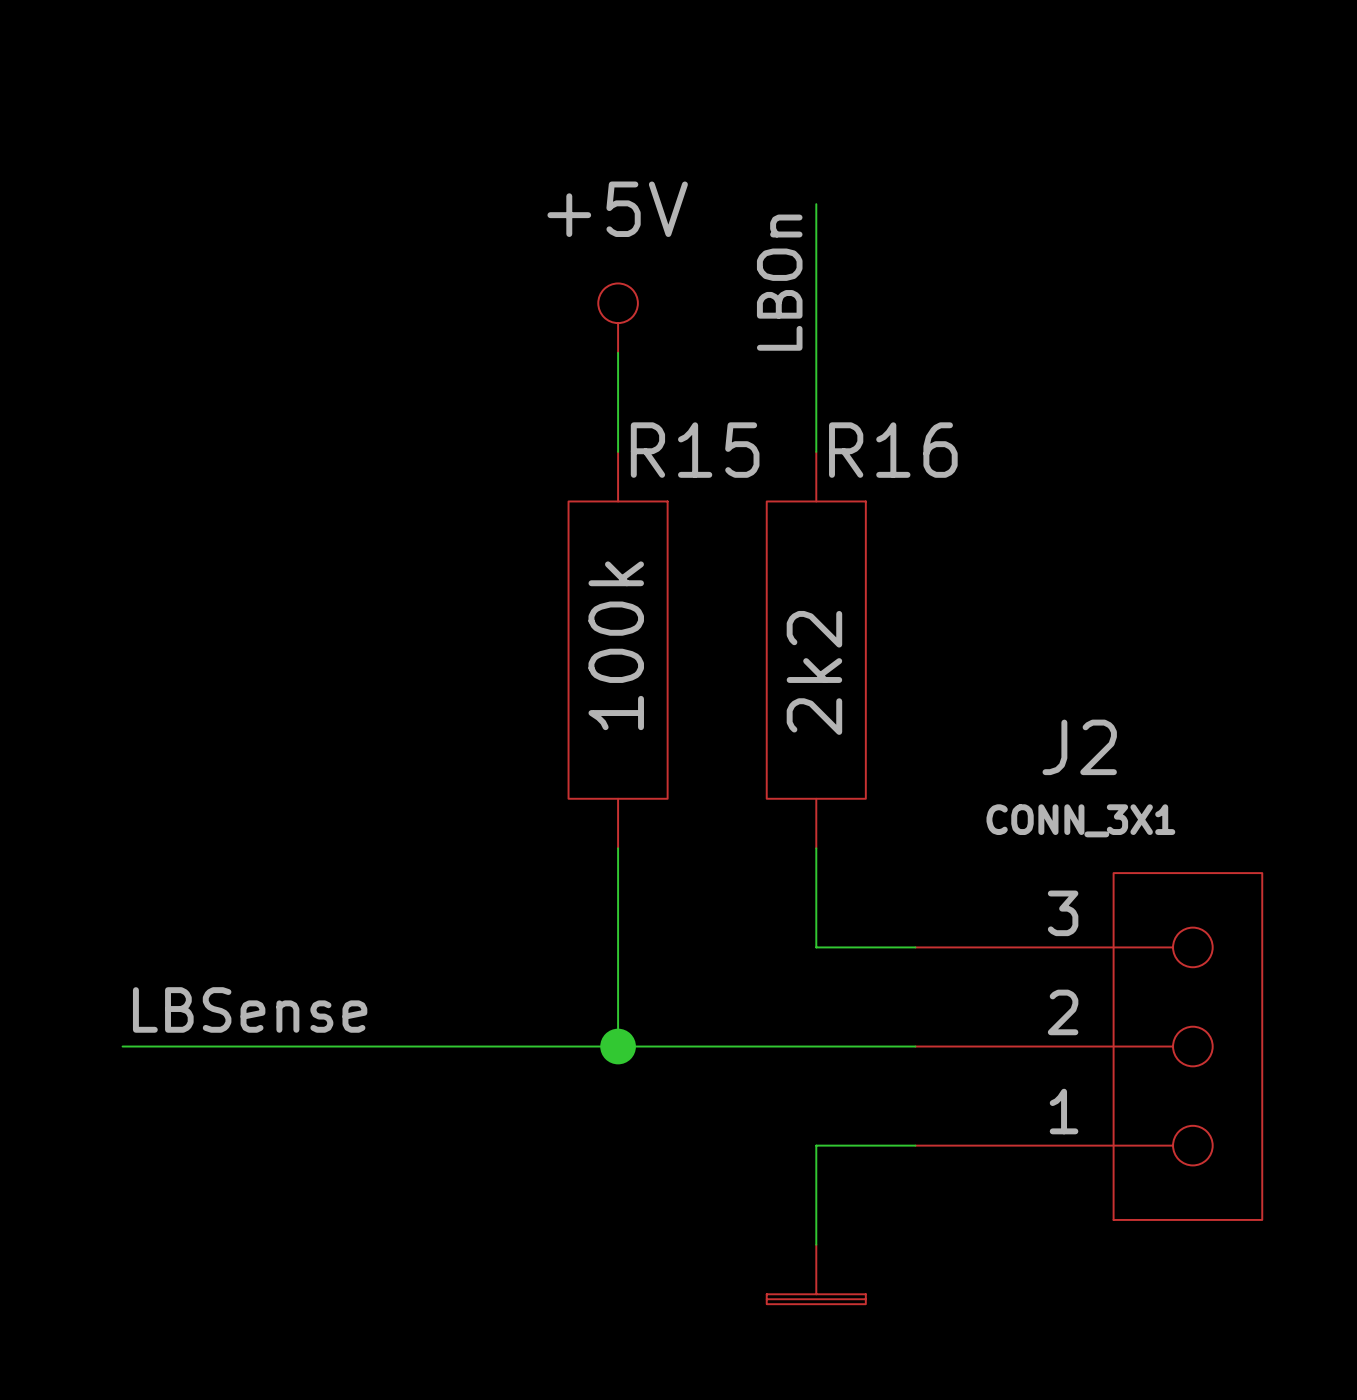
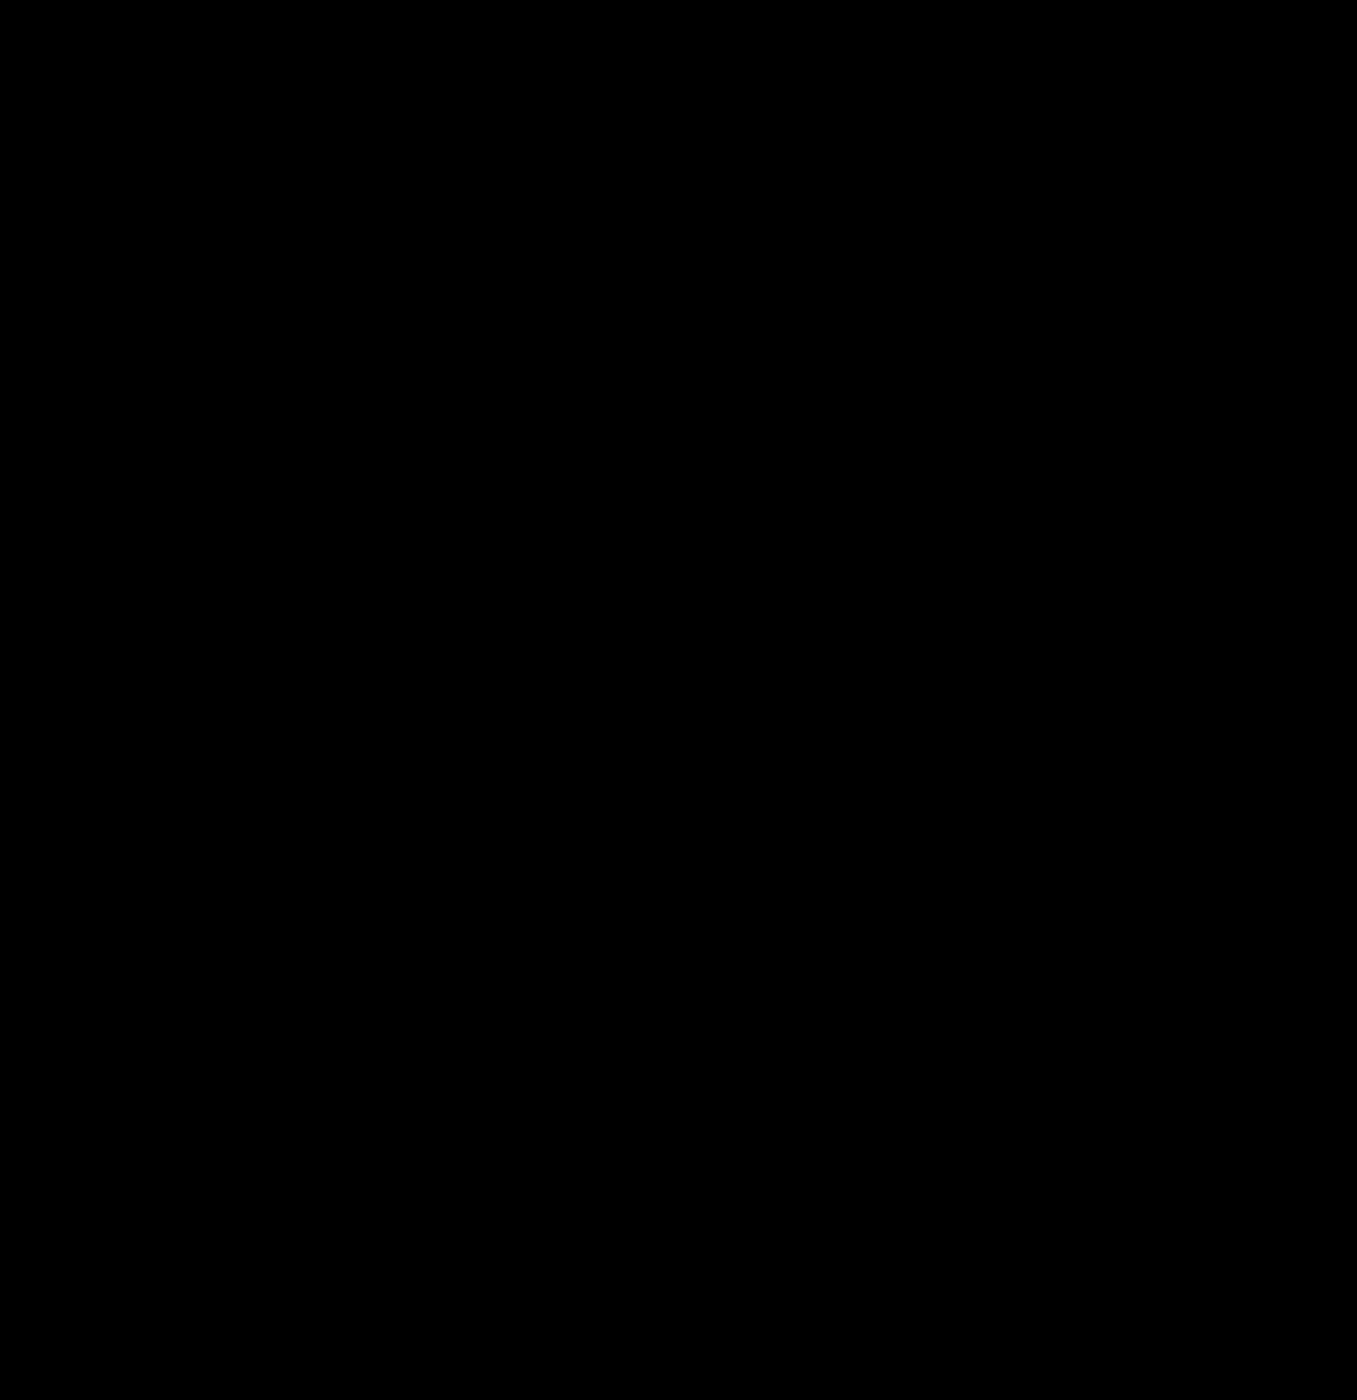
wire: (816, 204) (816, 451) -> none
label: LBOn (779, 282) -> none
power symbol: +5V (618, 318) -> none
wire: (618, 352) (618, 451) -> none
R15: 100k (618, 650) -> none
R16: 2k2 (816, 650) -> none
wire: (618, 848) (618, 1046) -> none
wire: (816, 848) (816, 947) (915, 947) -> none
label: LBSense (250, 1009) -> none
wire: (122, 1046) (915, 1046) -> none
junction: (618, 1046) -> none
J2: CONN_3X1 (1088, 1046) -> none
wire: (915, 1145) (816, 1145) (816, 1244) -> none
power symbol: (816, 1274) -> none

